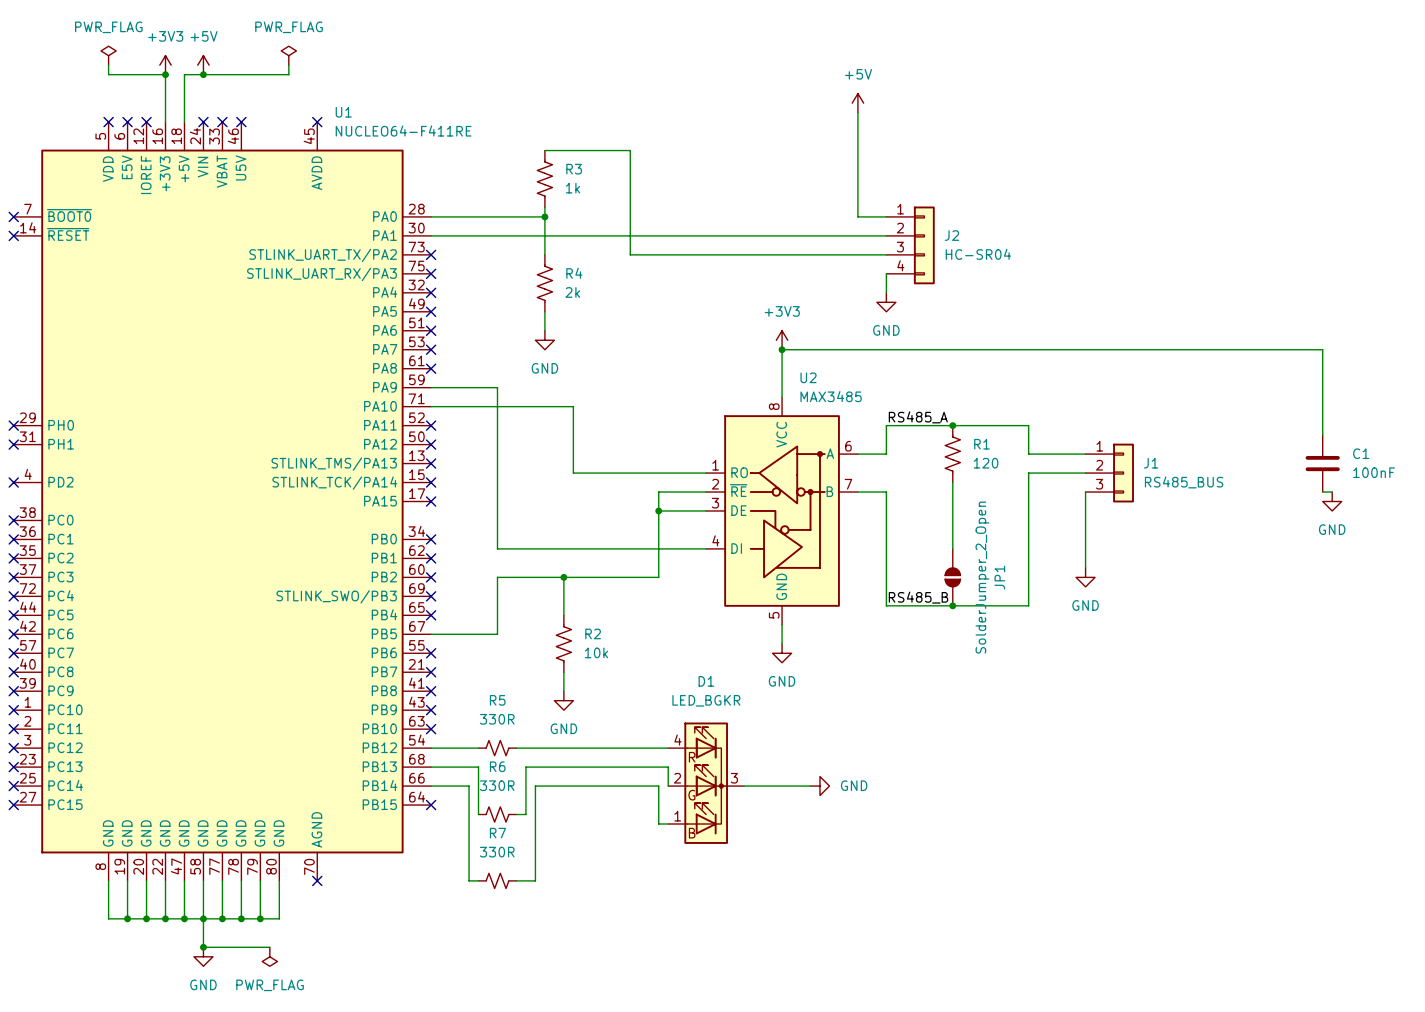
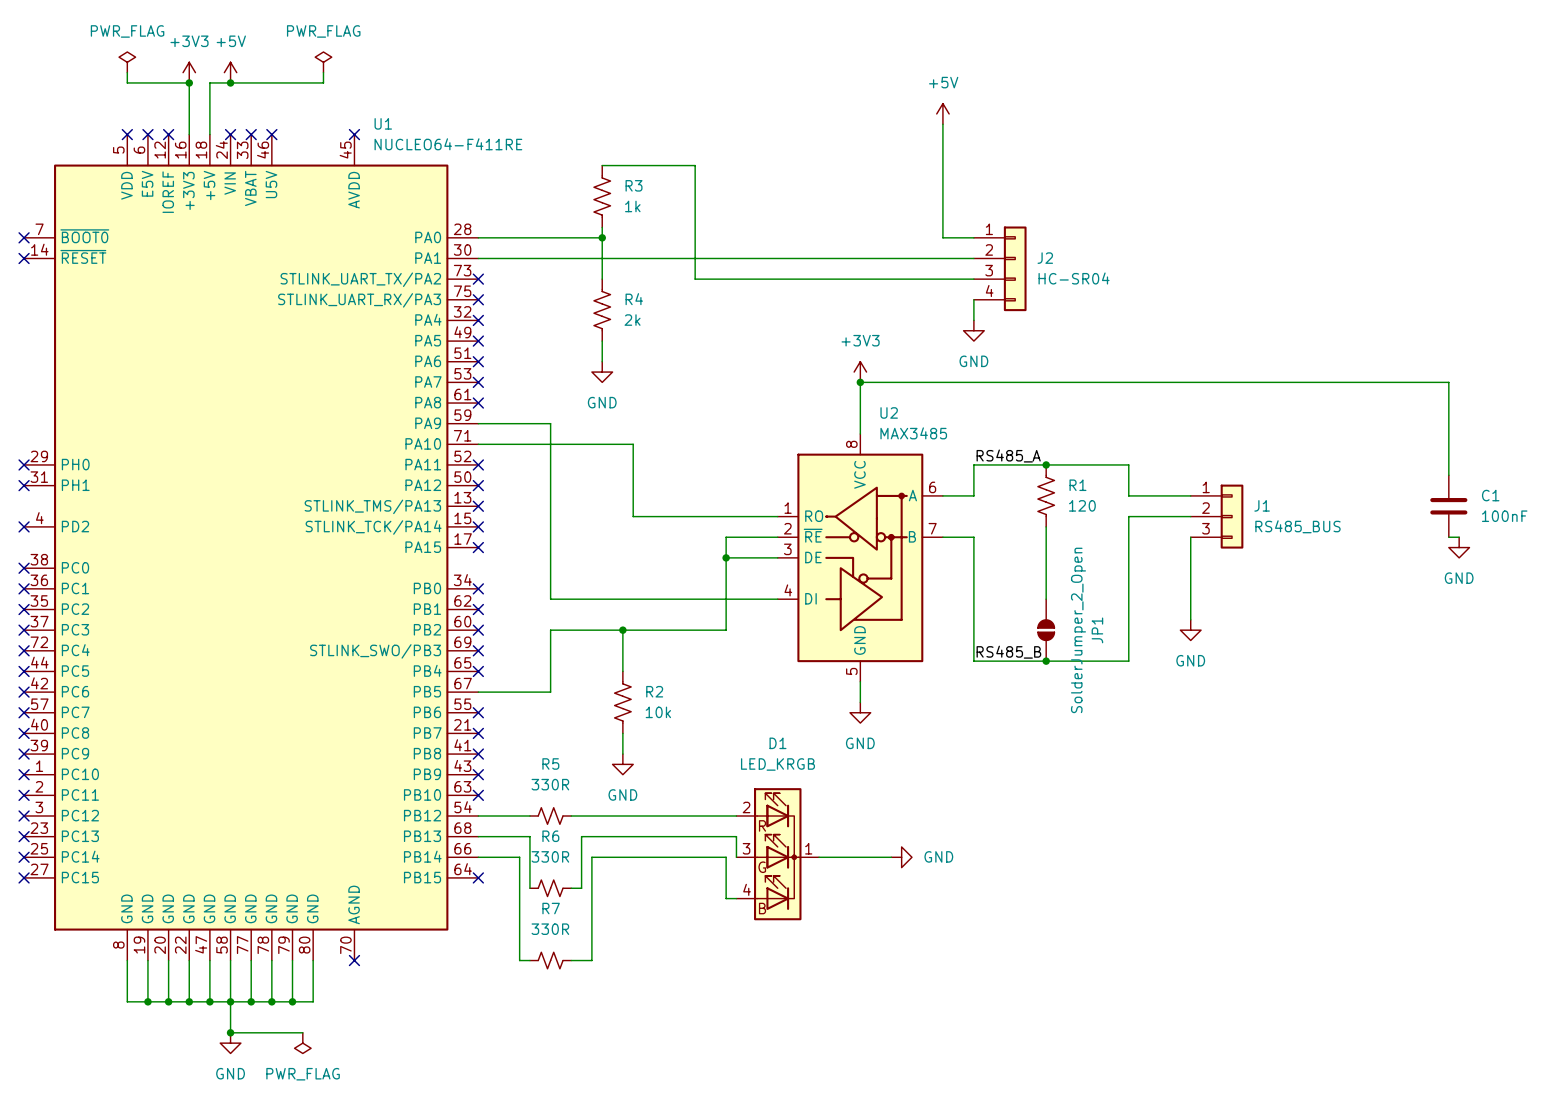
D1 value: LED_BGKR (706, 700) -> LED_KRGB (777, 764)
D1 pin number: 4 (677, 740) -> 2 (746, 807)
D1 pin number: 2 (677, 778) -> 3 (746, 848)
D1 pin number: 3 (734, 778) -> 1 (808, 848)
D1 pin number: 1 (677, 816) -> 4 (747, 889)

